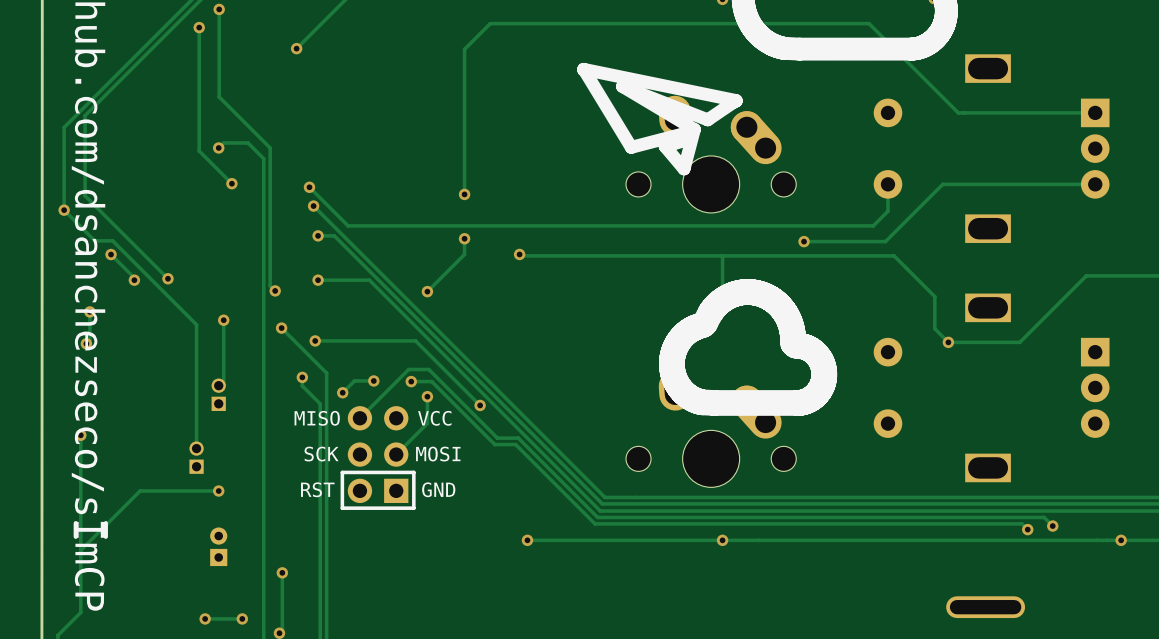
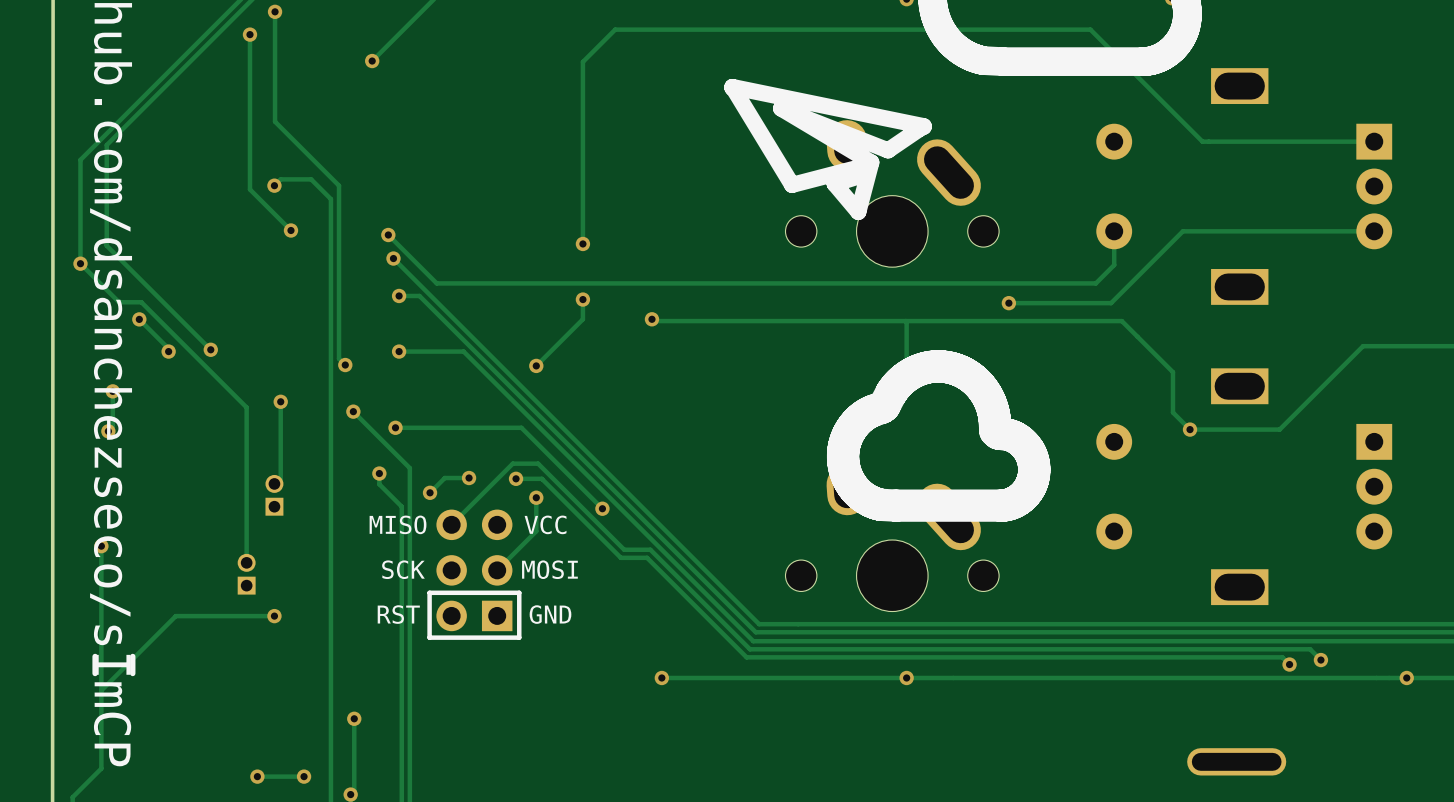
part footprint: [626, 95, 797, 213] -> [785, 120, 1000, 268]
part footprint: [626, 370, 797, 488] -> [785, 464, 1000, 612]
part: (218, 546) -> none

